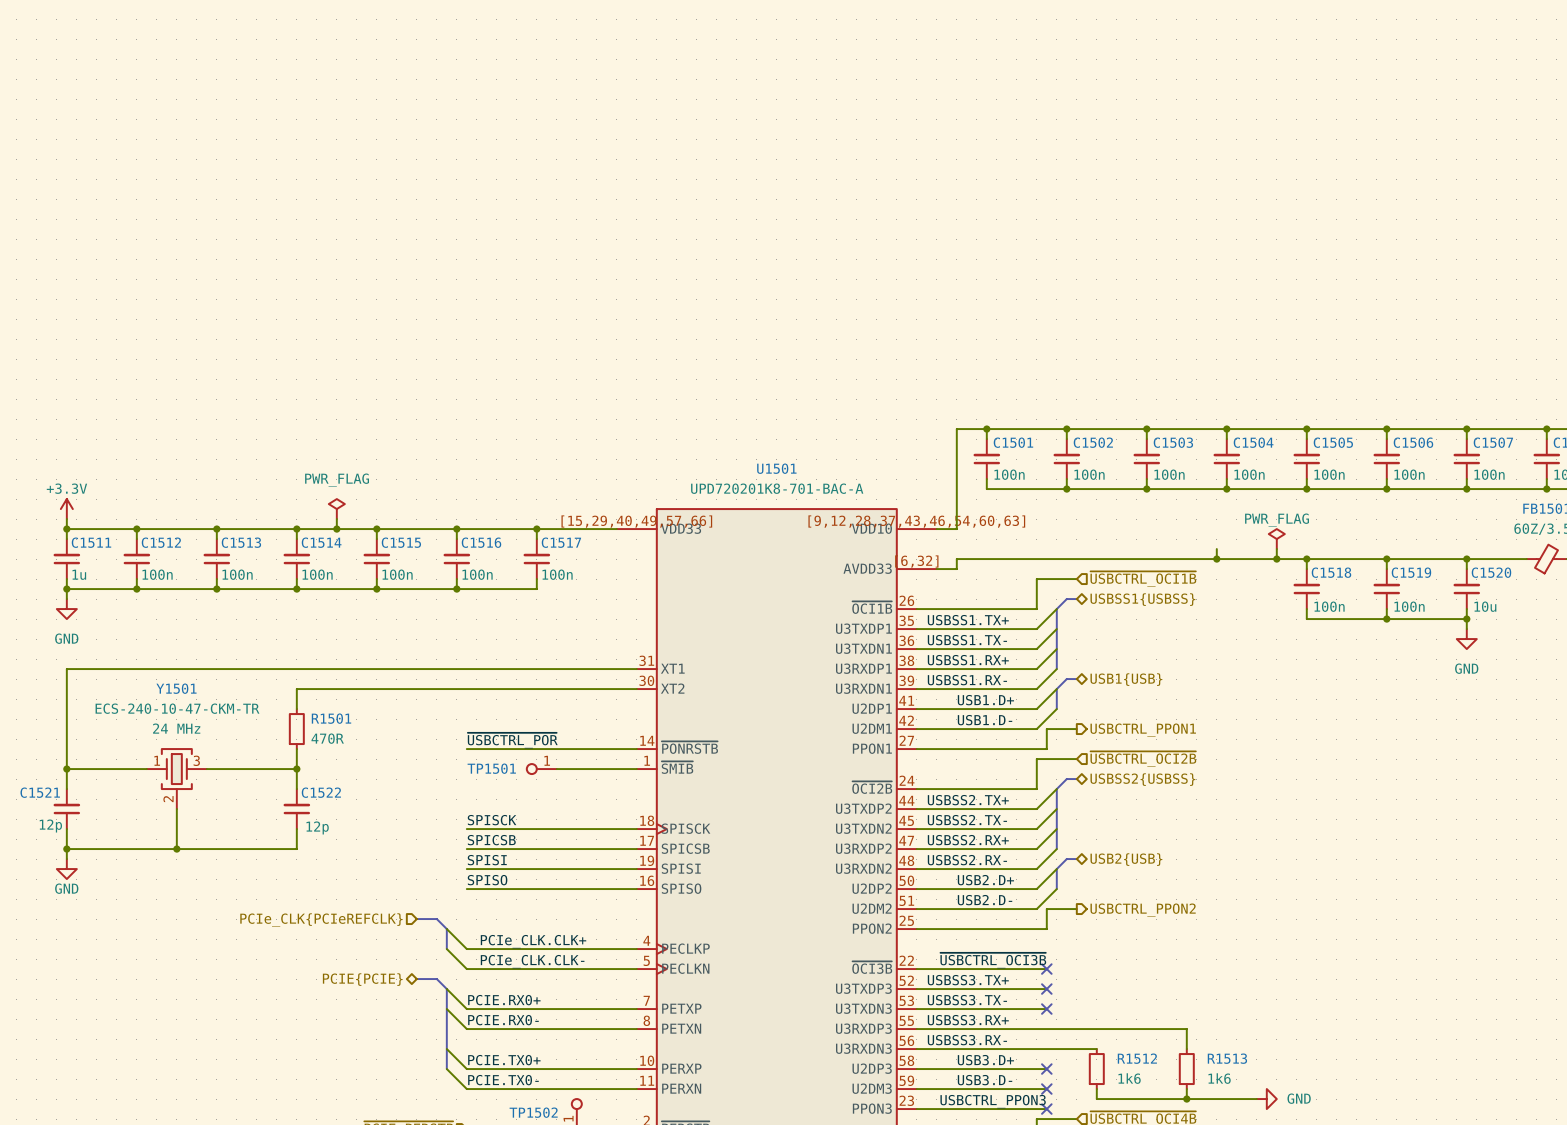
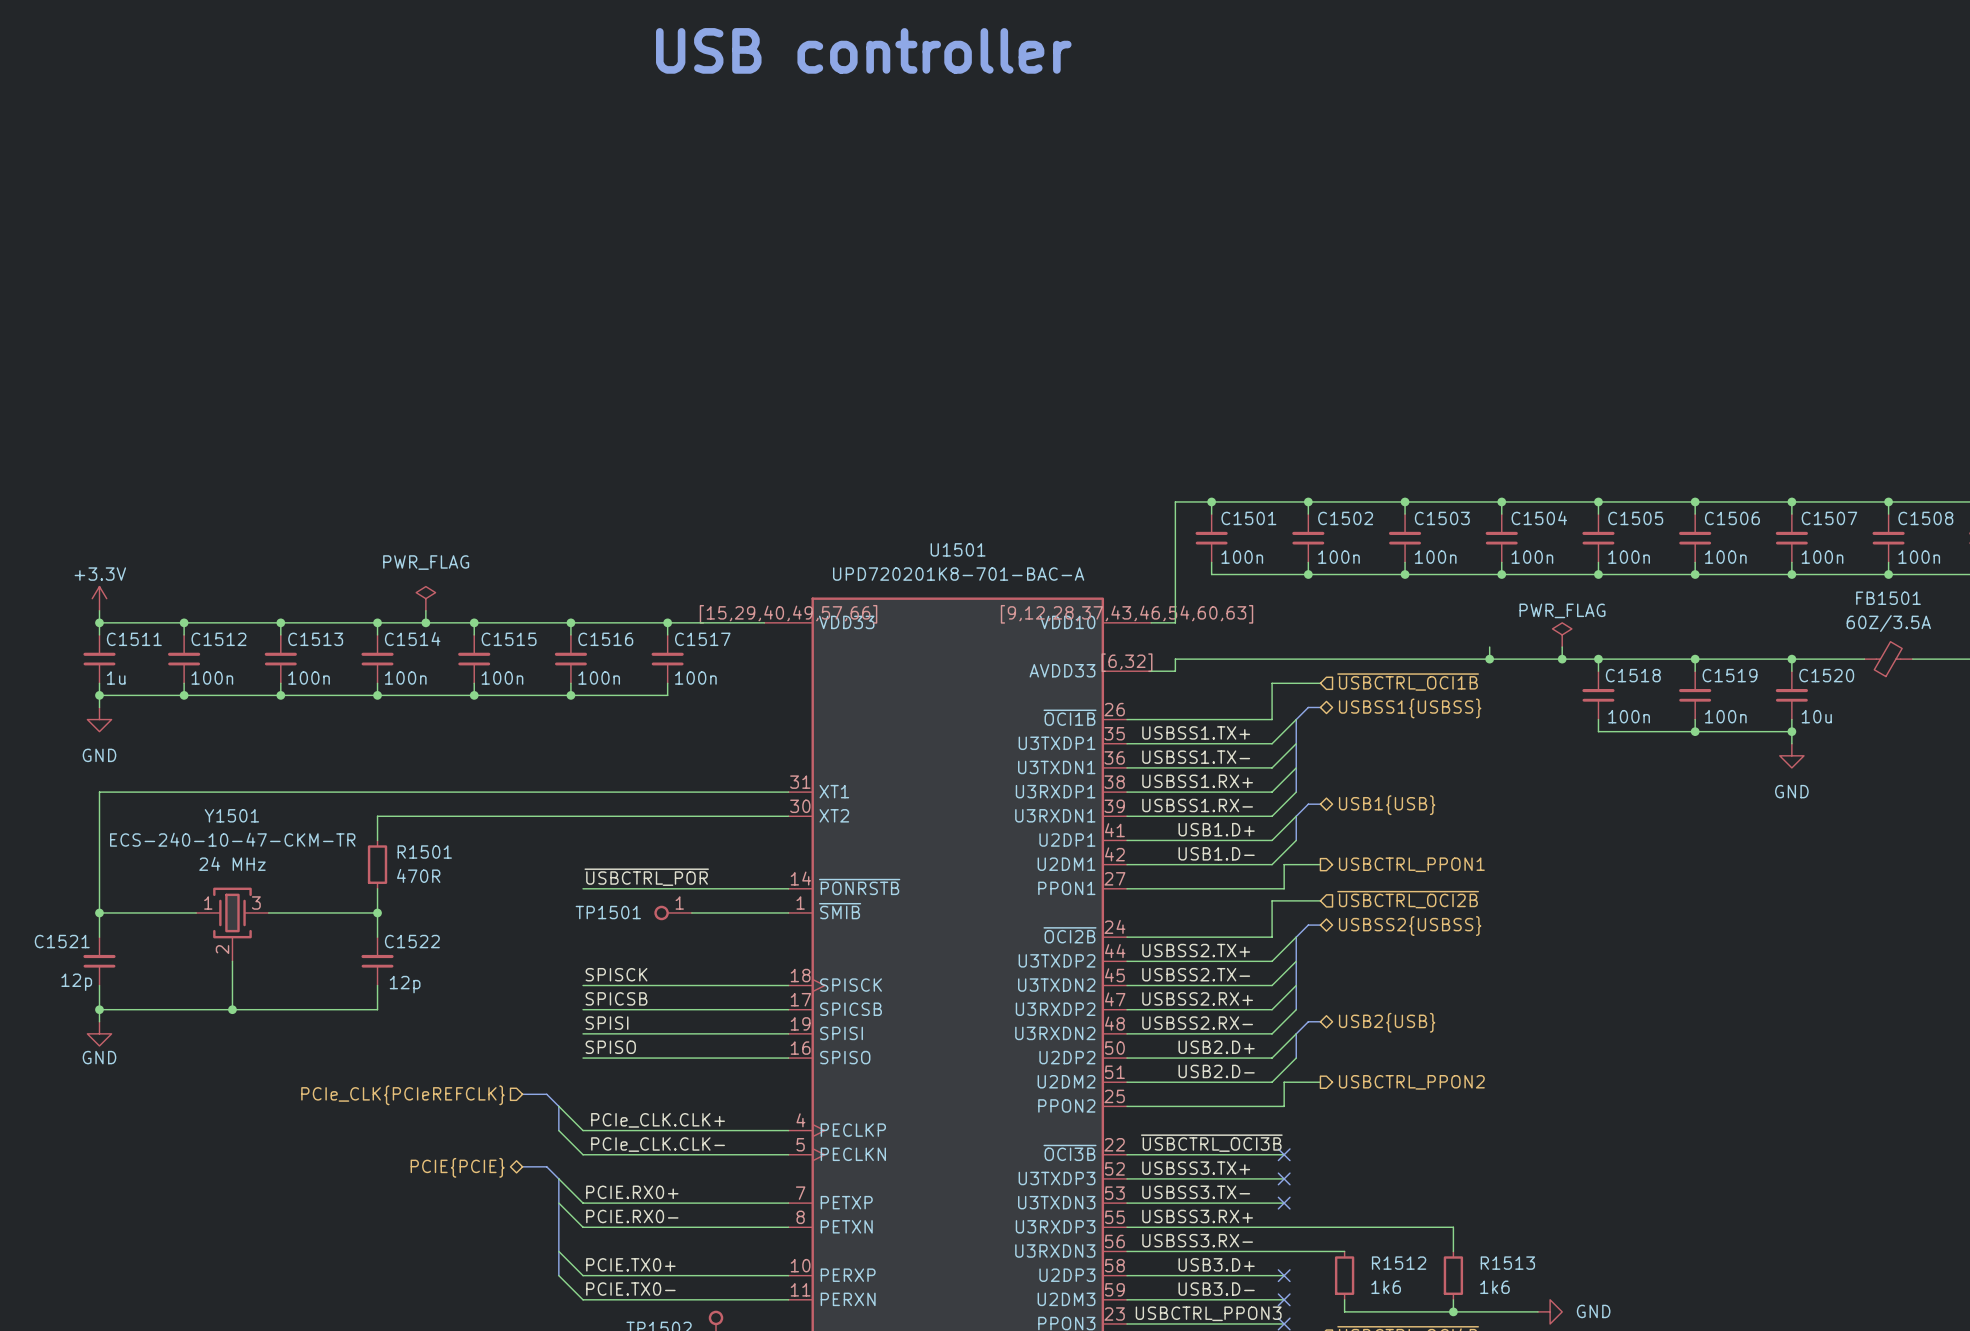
text: none -> USB controller (863, 50)

